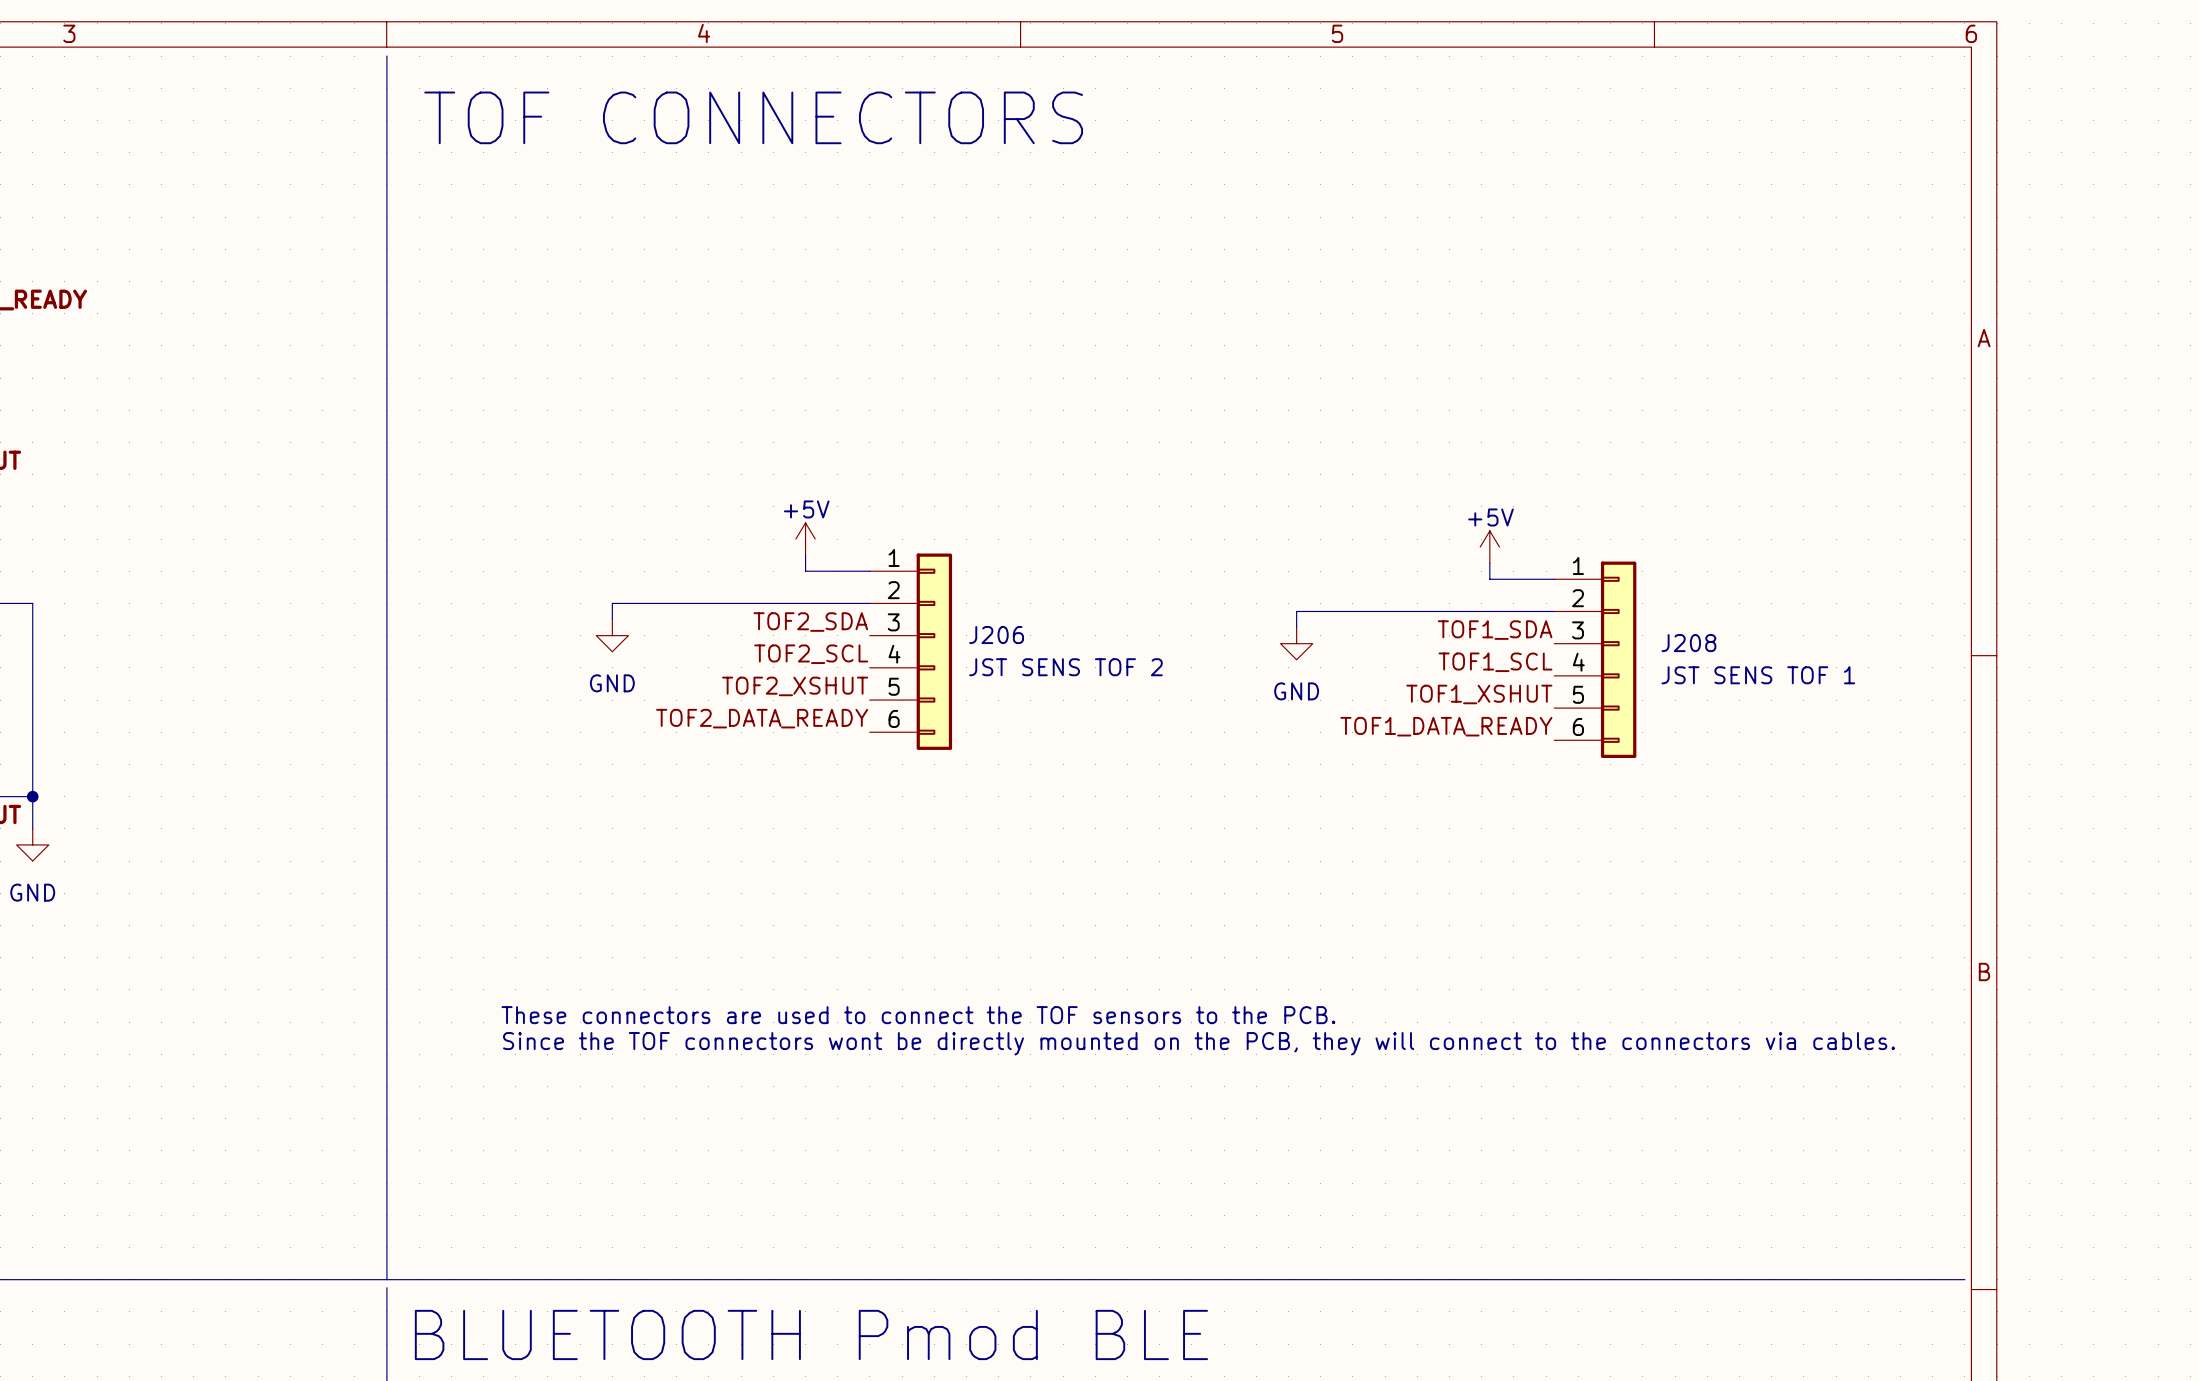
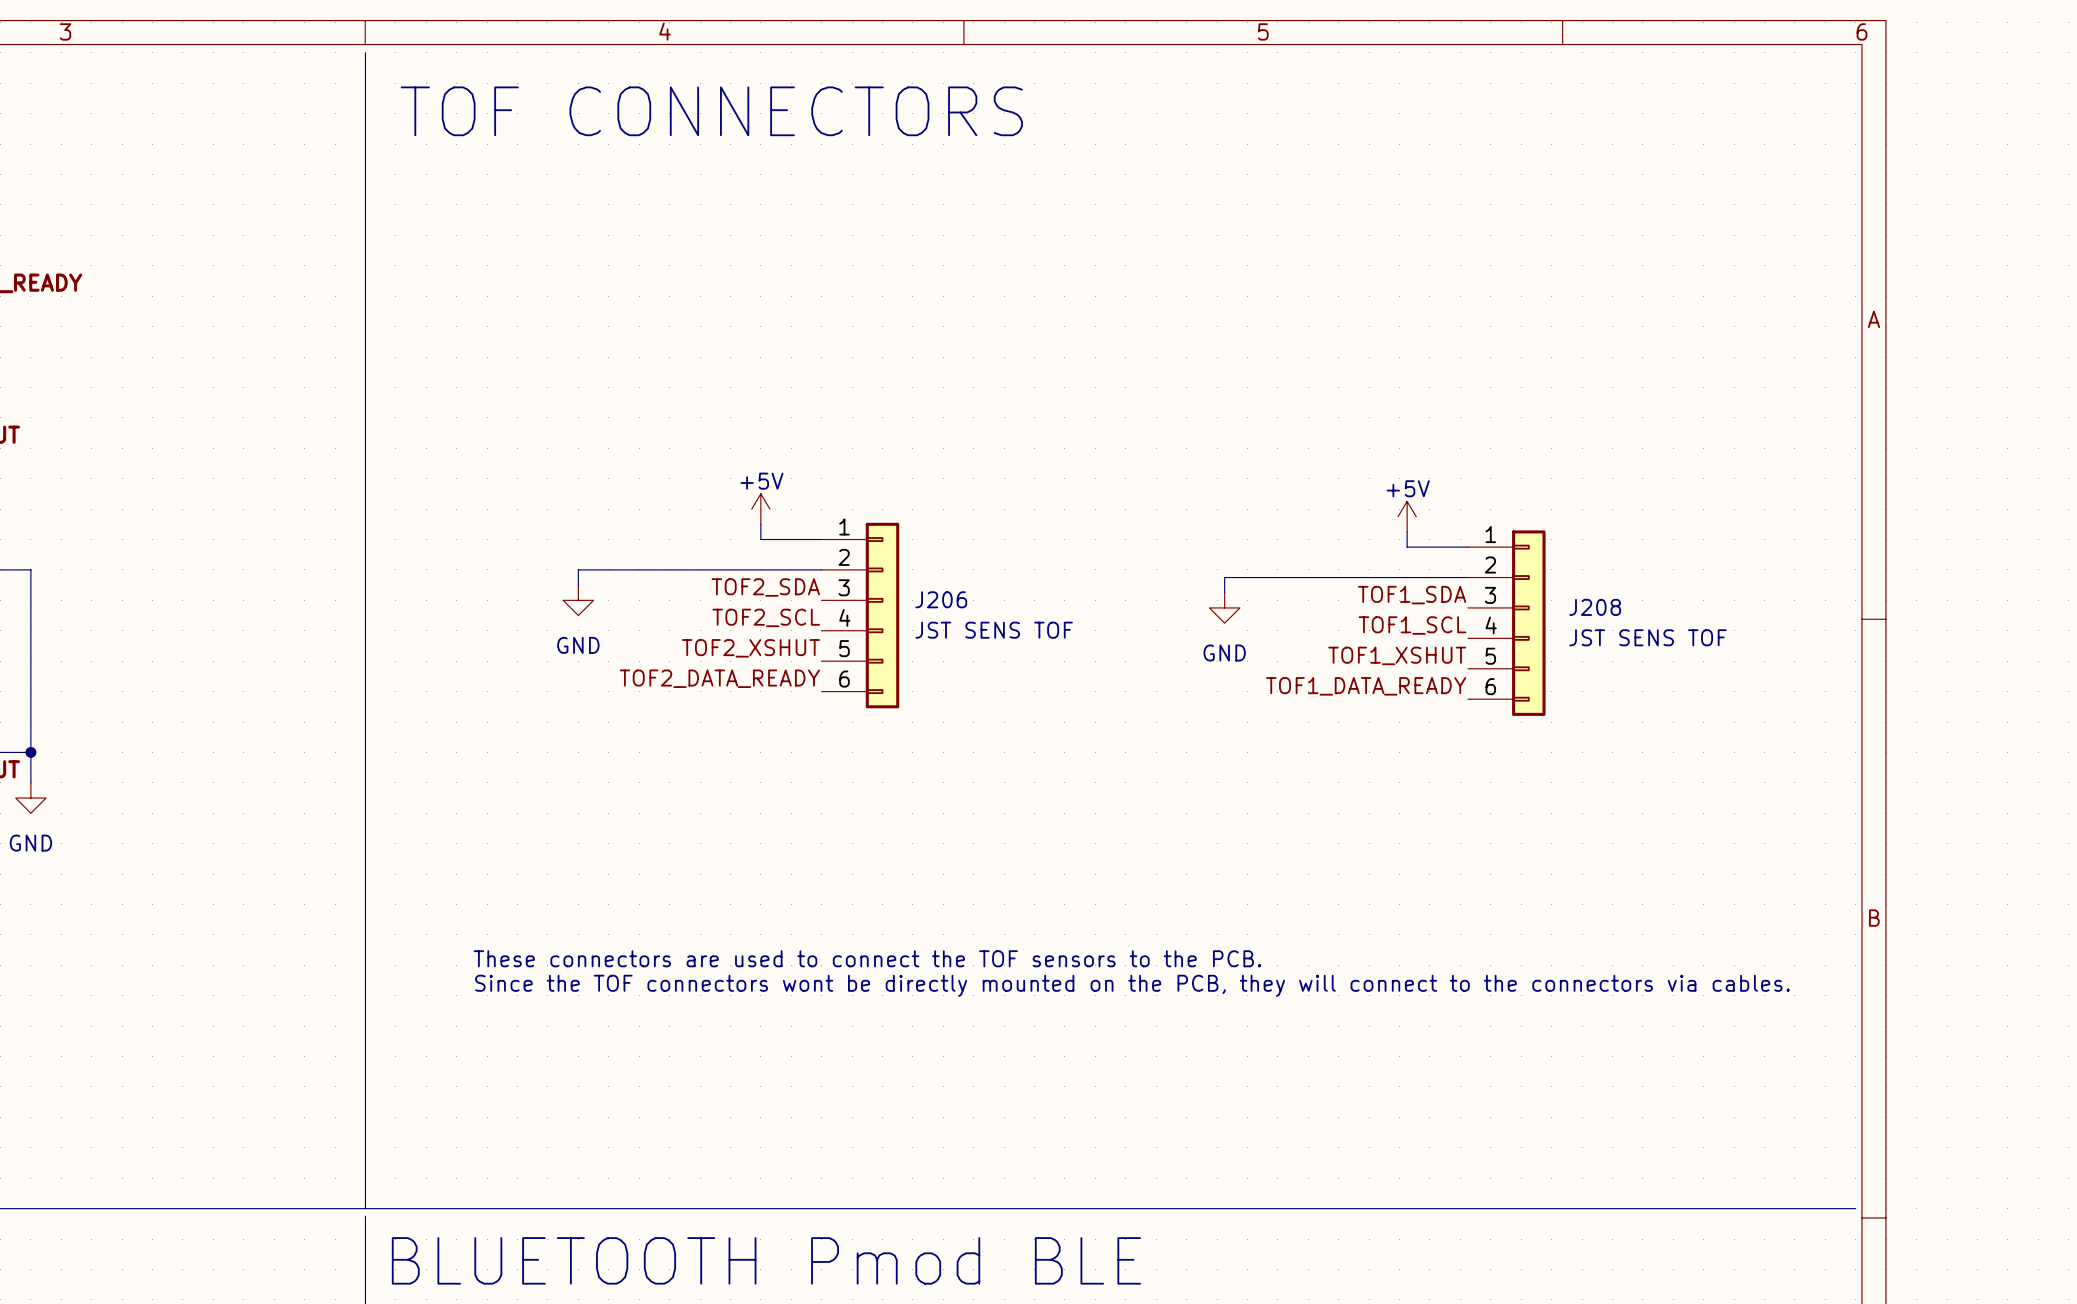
J206 value: JST SENS TOF 2 (1065, 667) -> JST SENS TOF (994, 630)
J208 value: JST SENS TOF 1 (1758, 675) -> JST SENS TOF (1648, 637)

